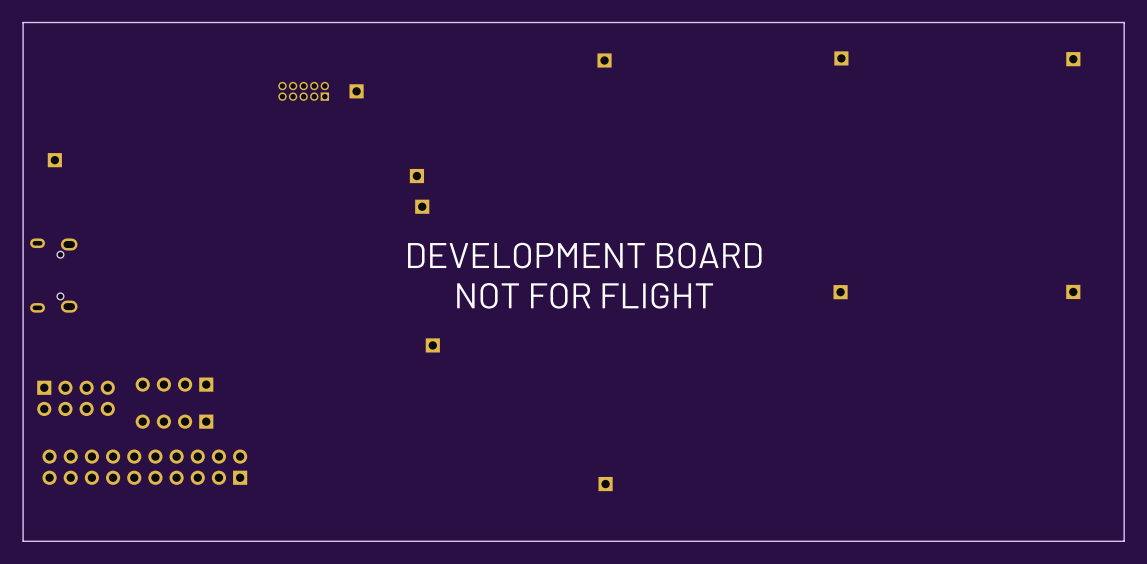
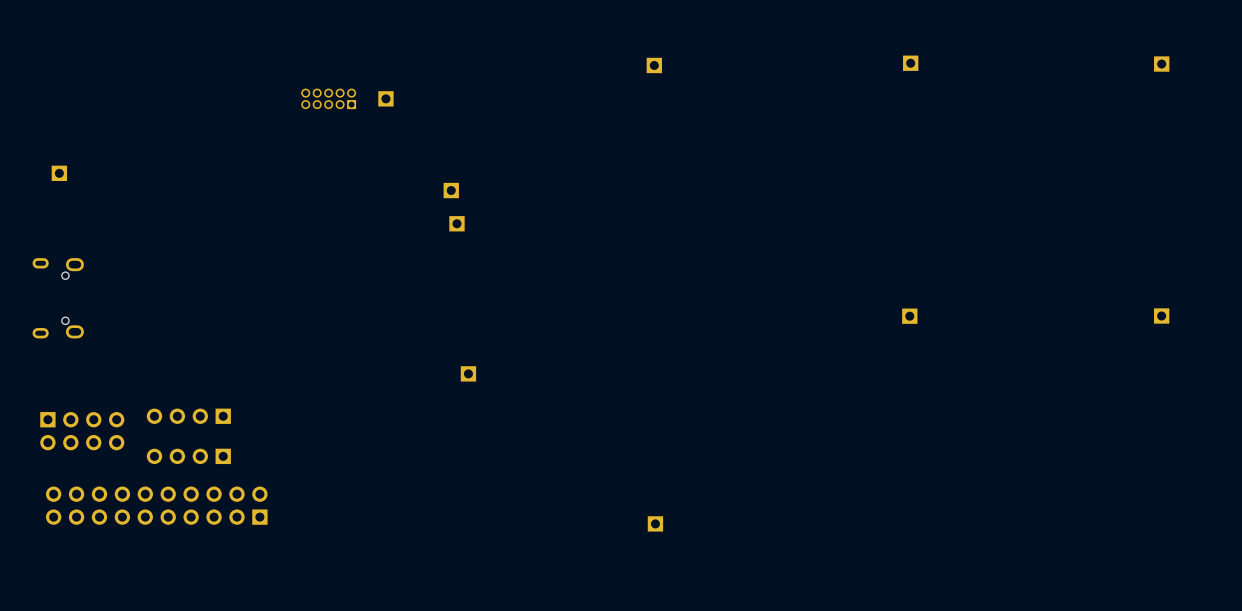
board edge: (1124, 22) (23, 22) (23, 541) (1124, 541) (1124, 22) -> none
text: DEVELOPMENT BOARD (584, 255) -> none
text: NOT FOR FLIGHT (585, 295) -> none

